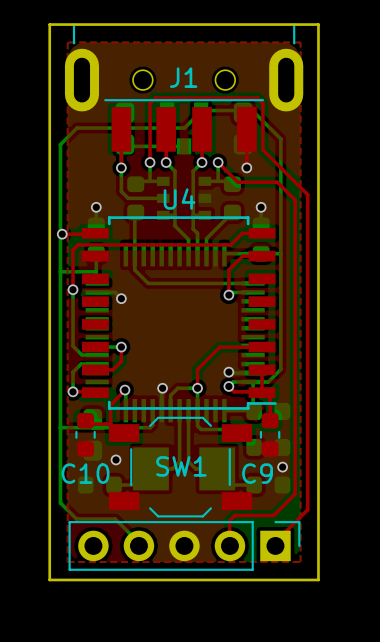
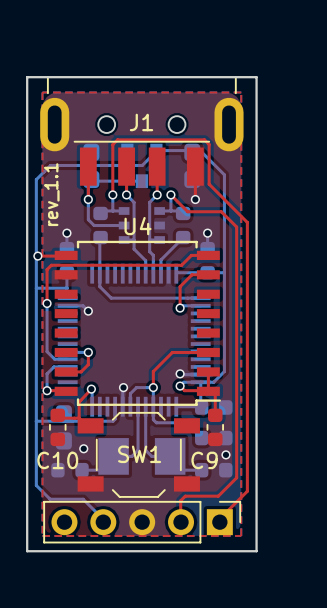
text: none -> rev_1.1 (51, 194)

